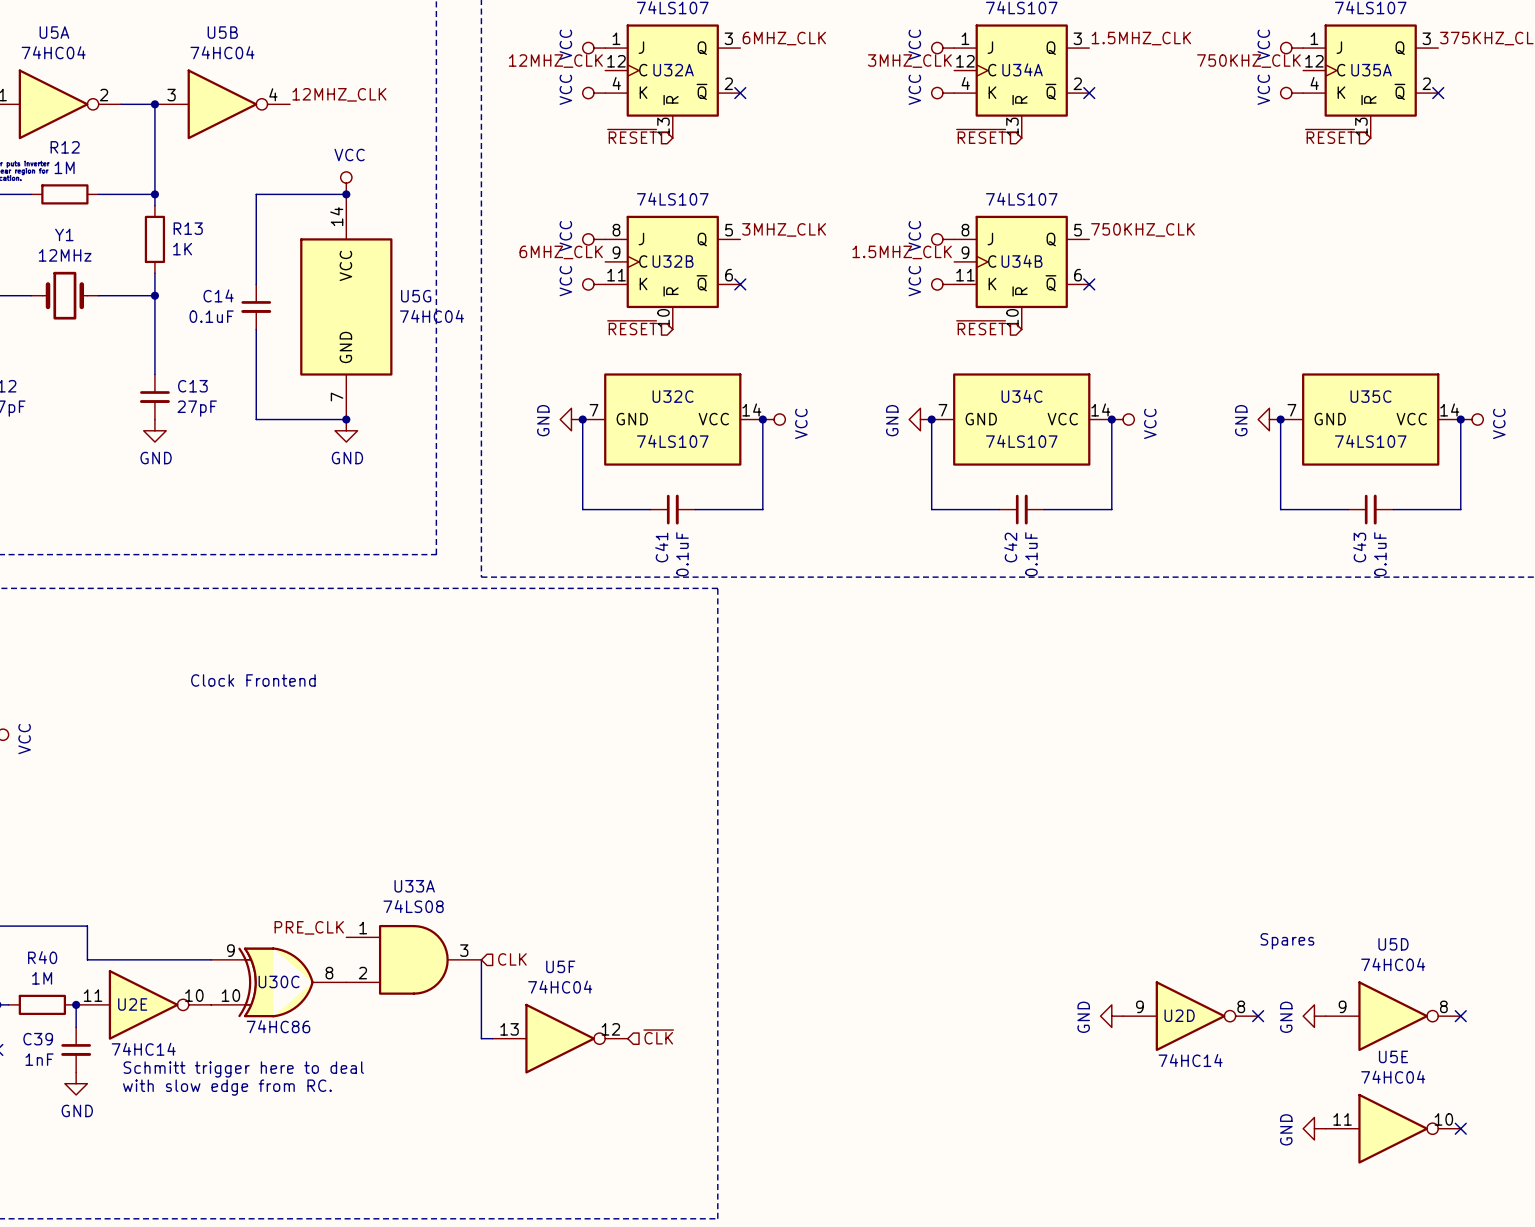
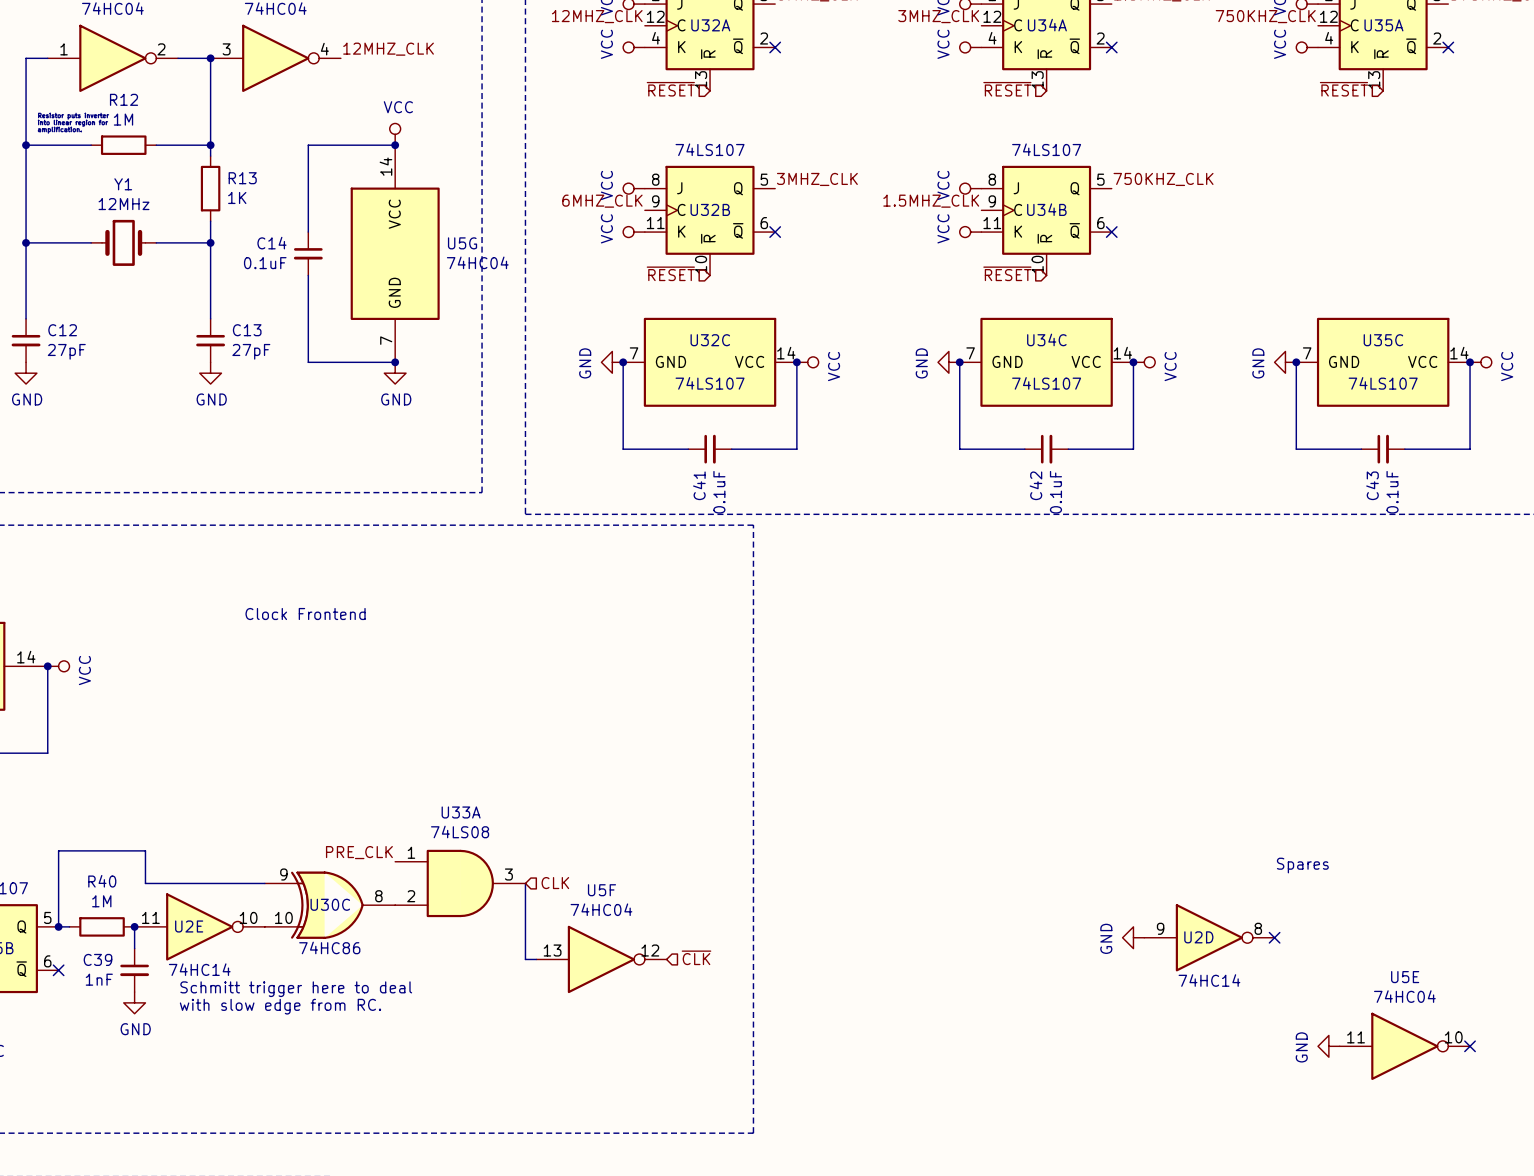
power symbol: GND (1314, 1016) -> none
U5D: 74HC04 (1393, 1016) -> none
no-connect mark: (1460, 1016) -> none

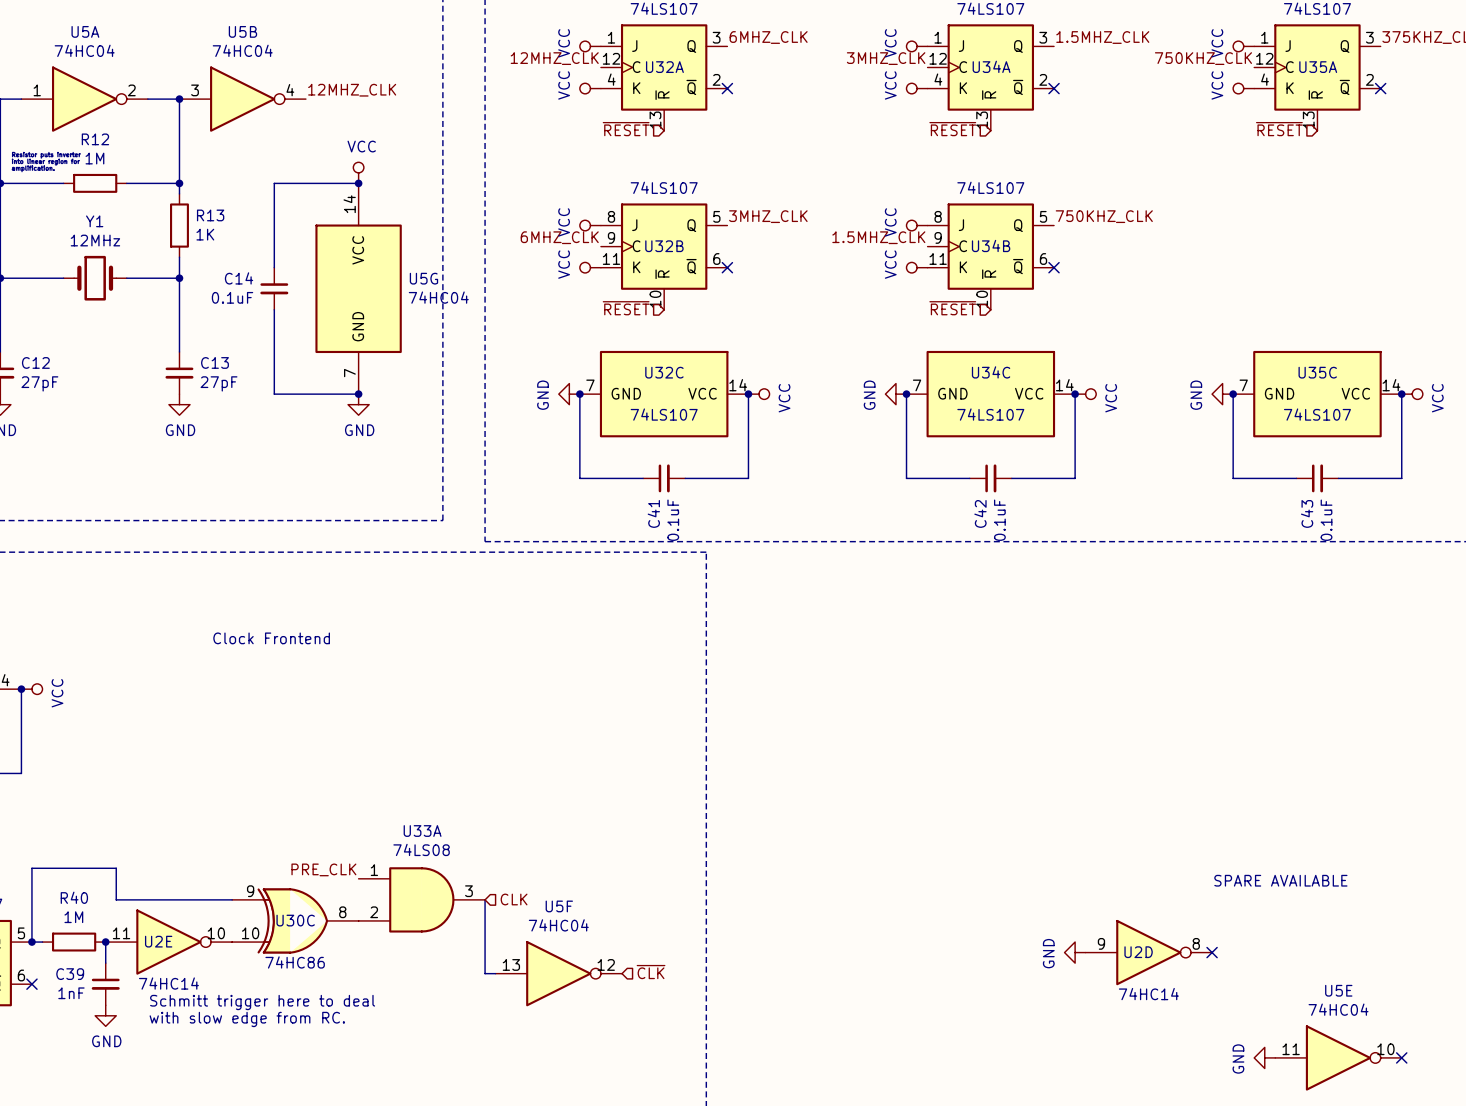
text: Spares (1302, 865) -> SPARE AVAILABLE (1280, 880)

